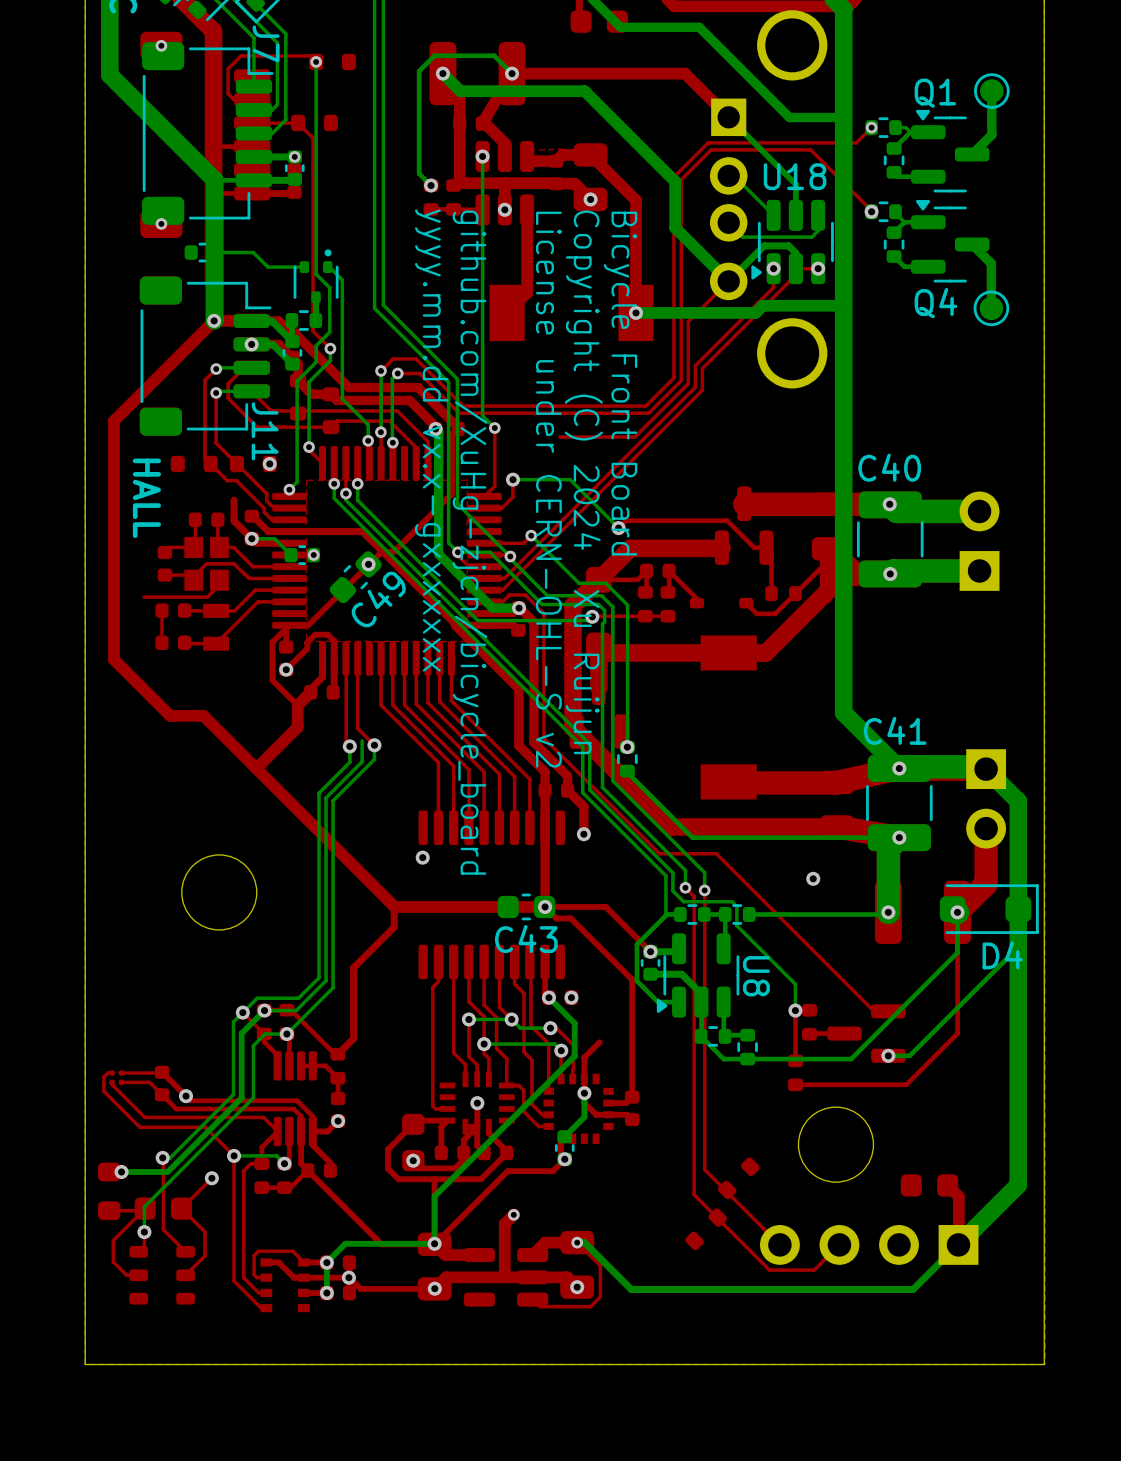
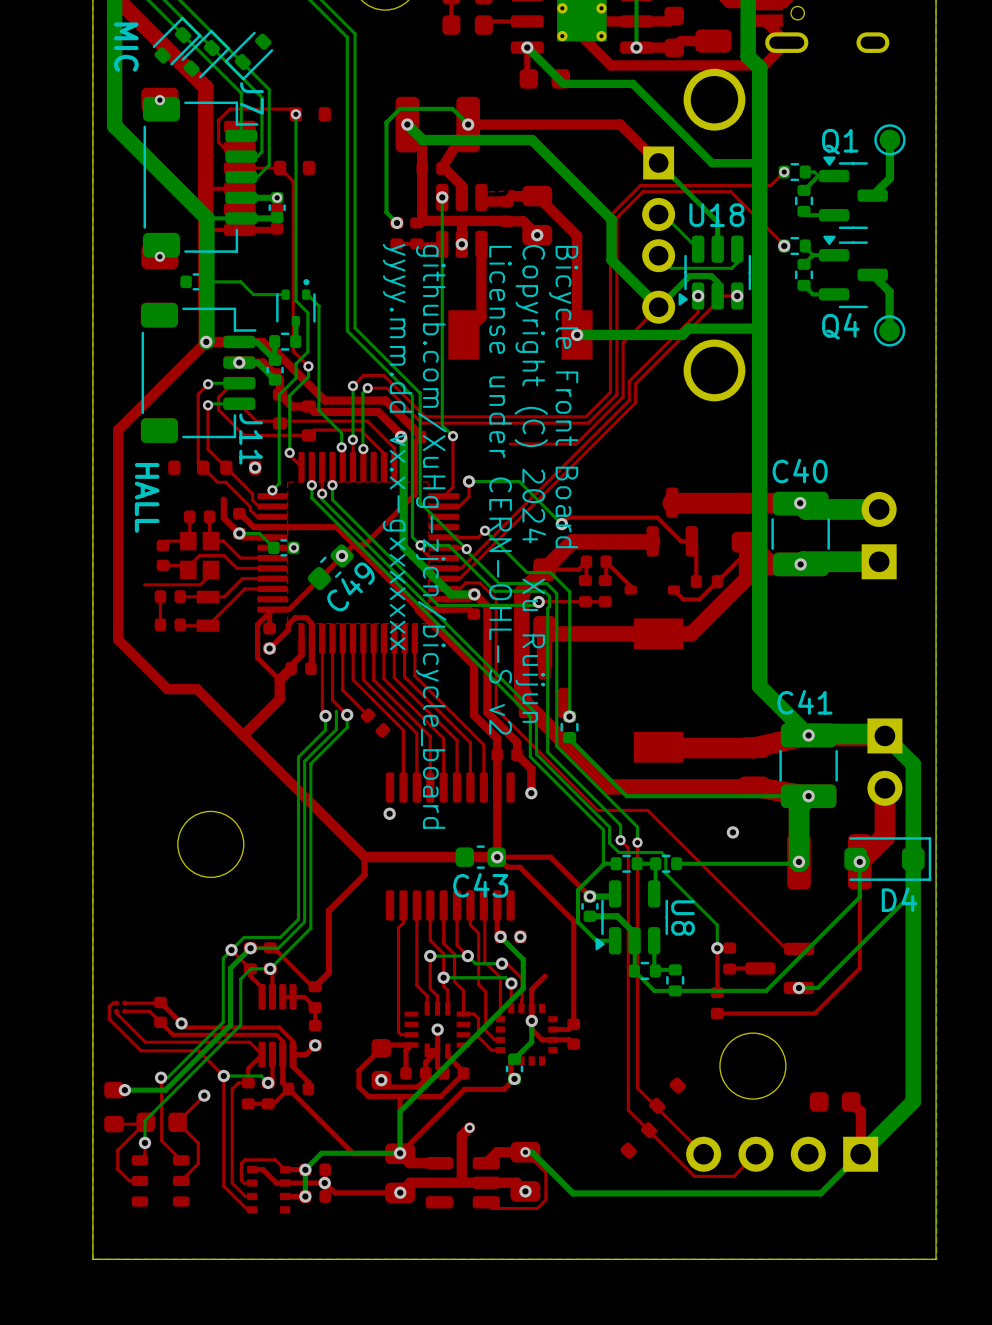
top track: none -> (342, 638) (342, 690) (368, 715)
part: none -> (375, 723)

